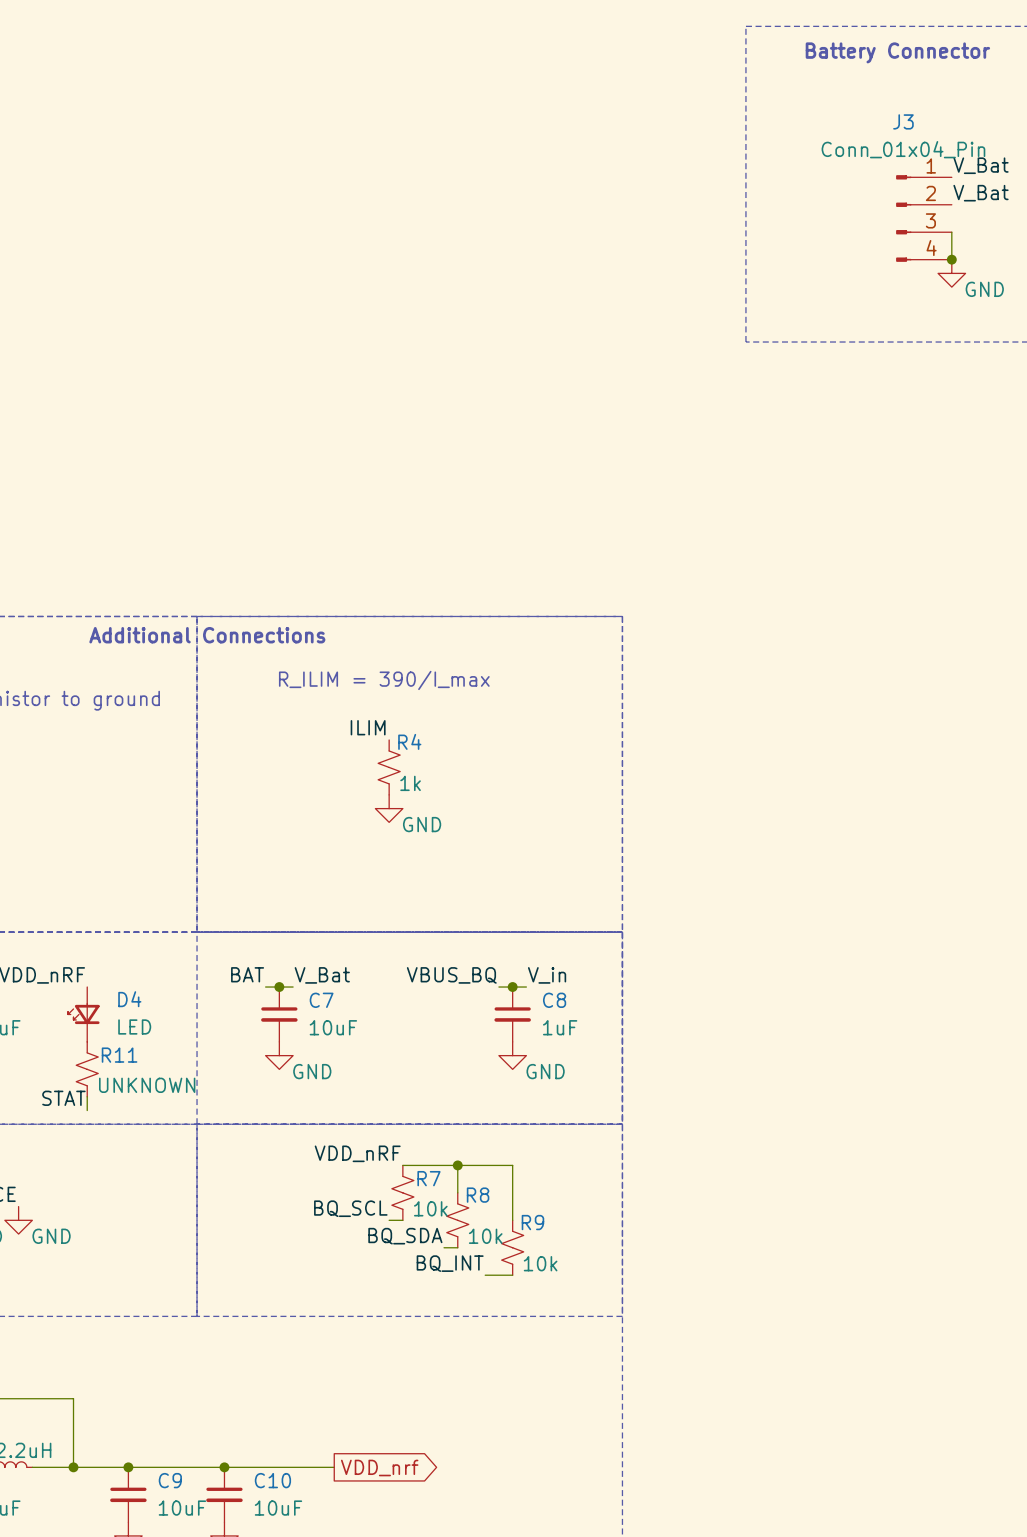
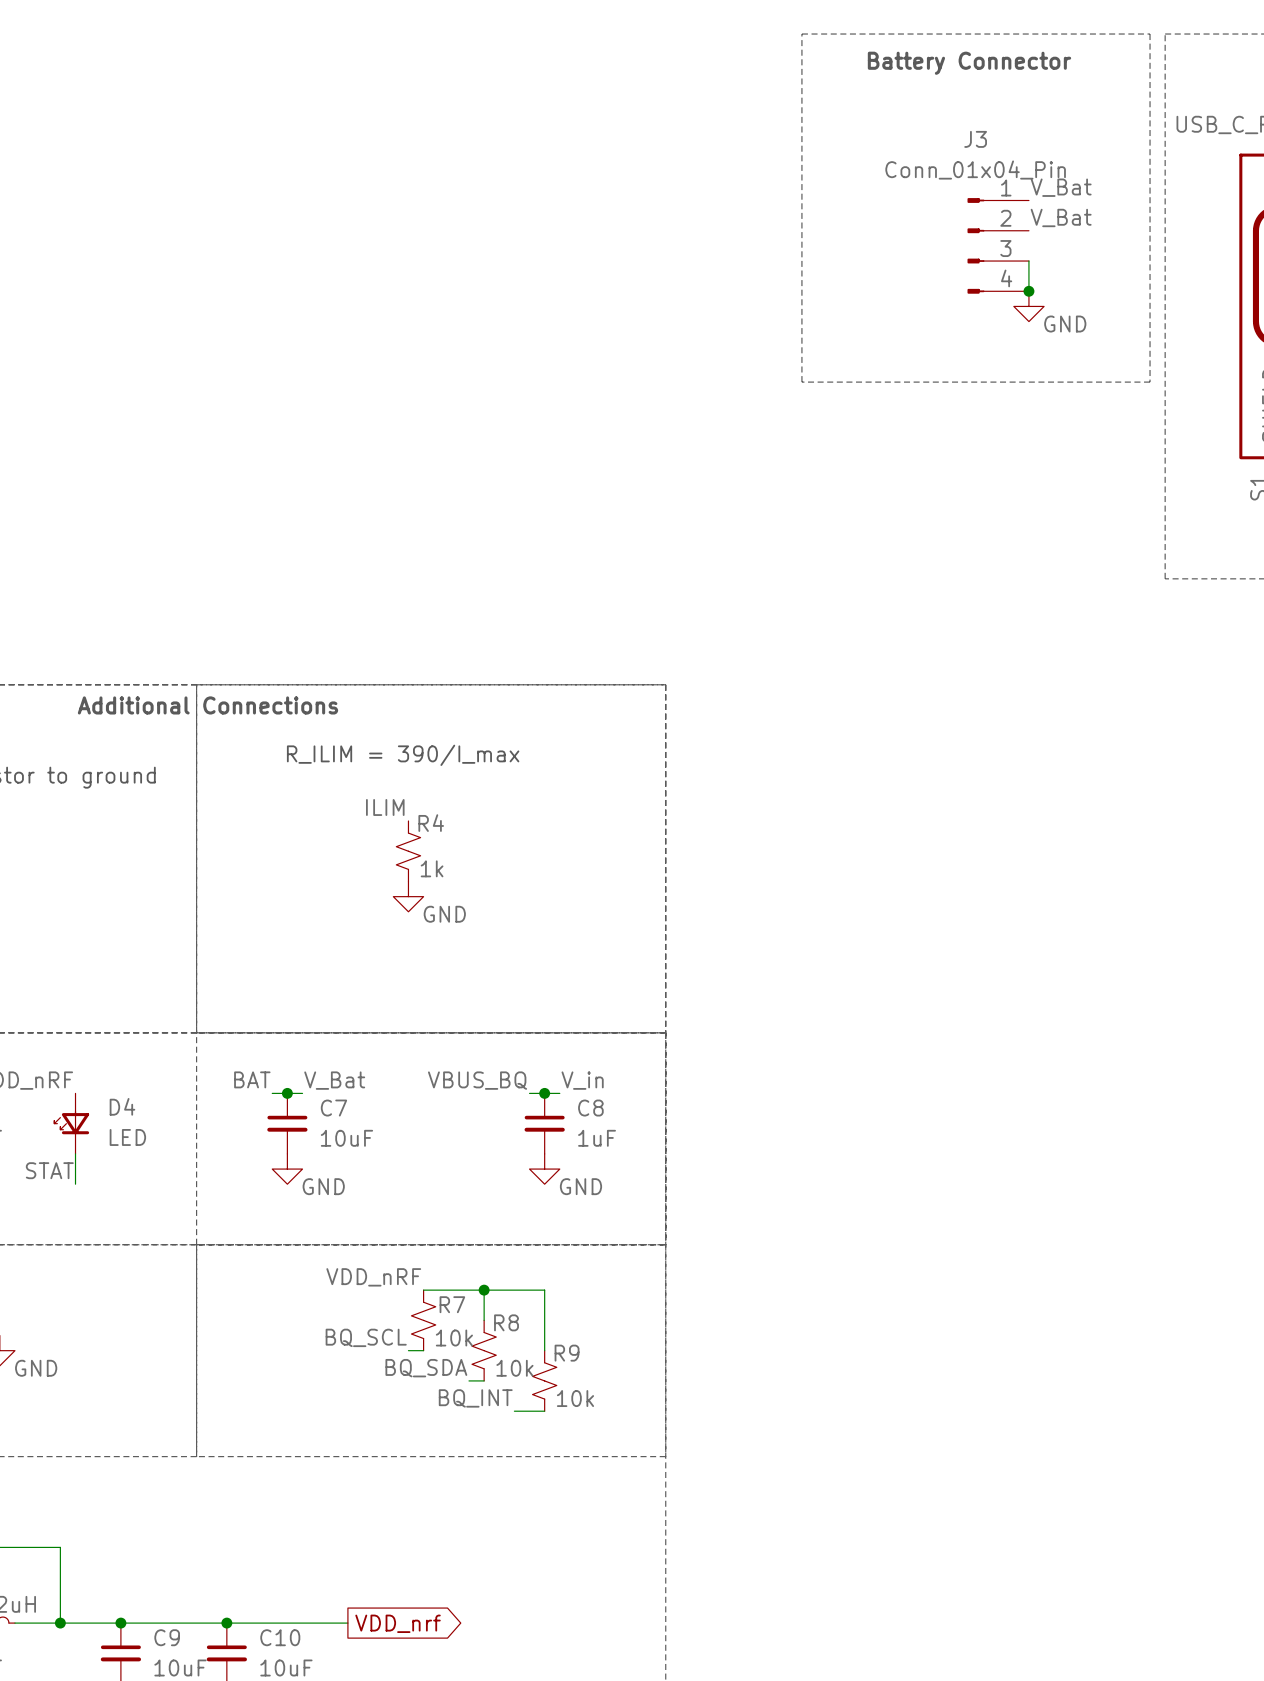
wire: none -> (75, 1153) (75, 1184)
R11: UNKNOWN (87, 1069) -> none
wire: (87, 1096) (87, 1110) -> none
label position: STAT (63, 1098) -> STAT (49, 1170)

